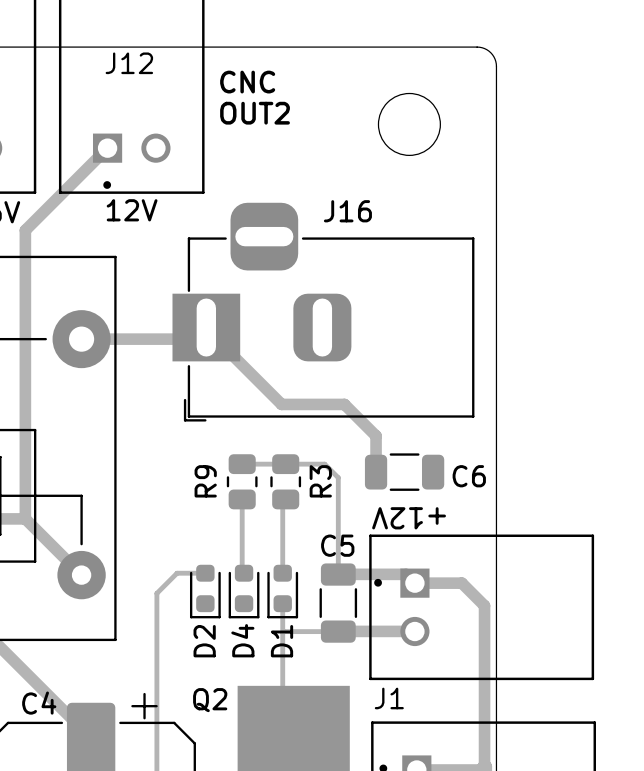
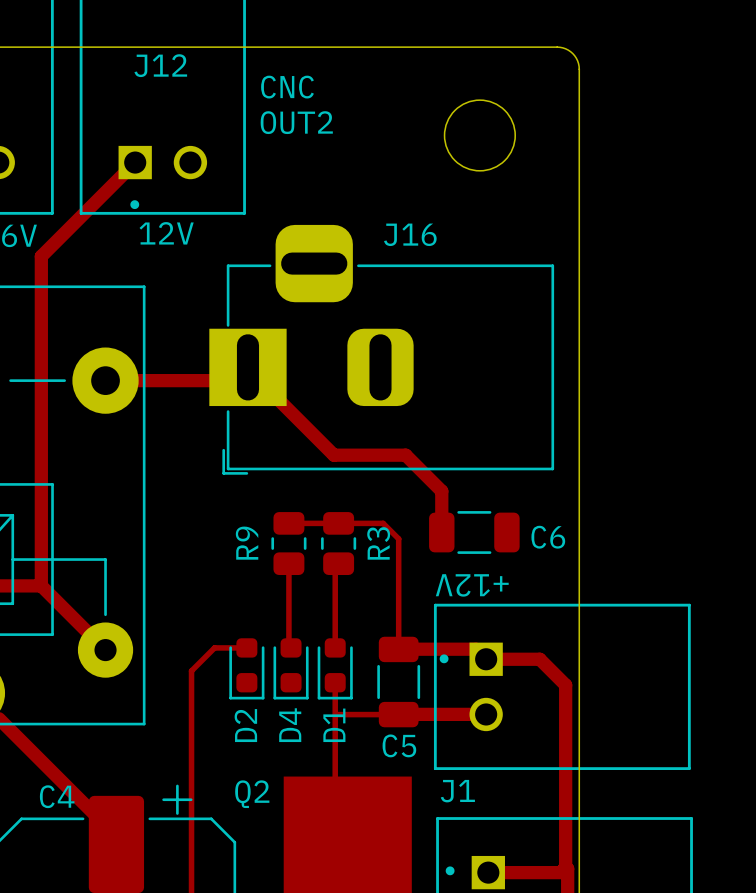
C5 name position: C5 (337, 545) -> C5 (399, 745)

